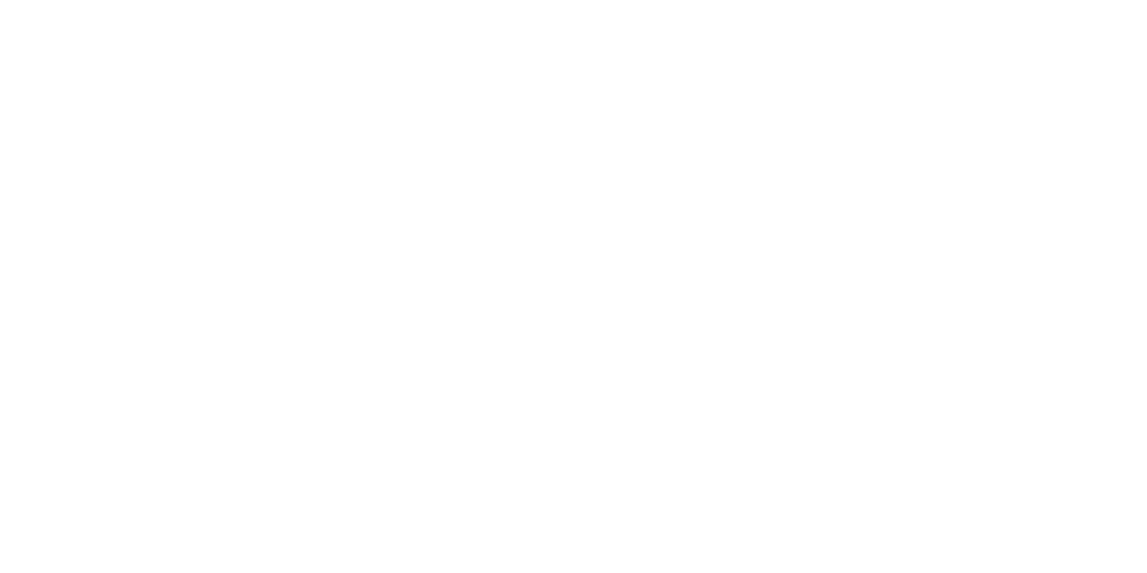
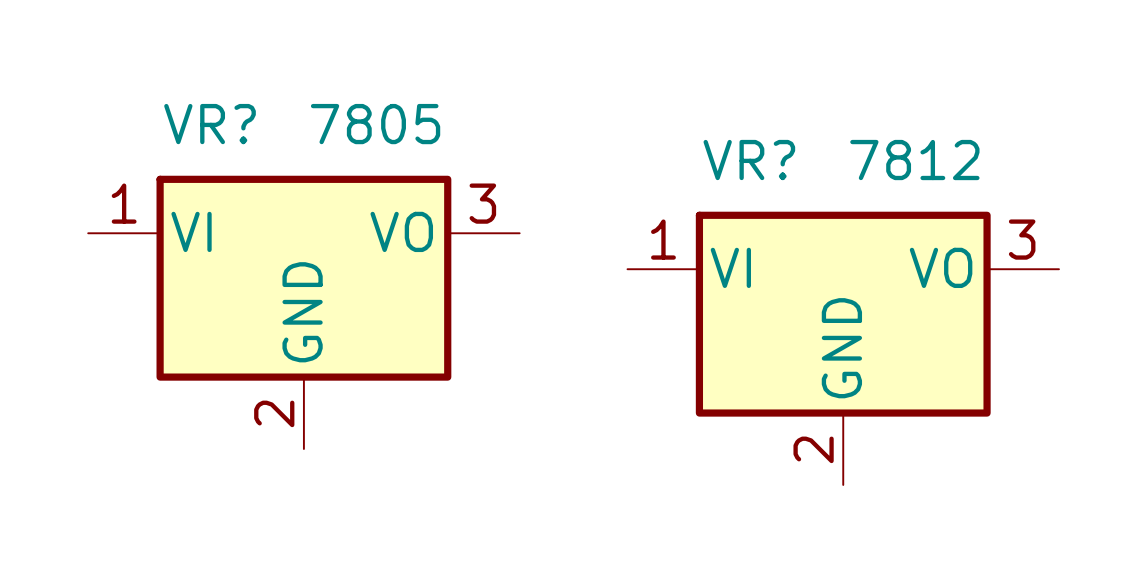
VR?: none -> 7805 (303, 312)
VR?: none -> 7812 (843, 348)

